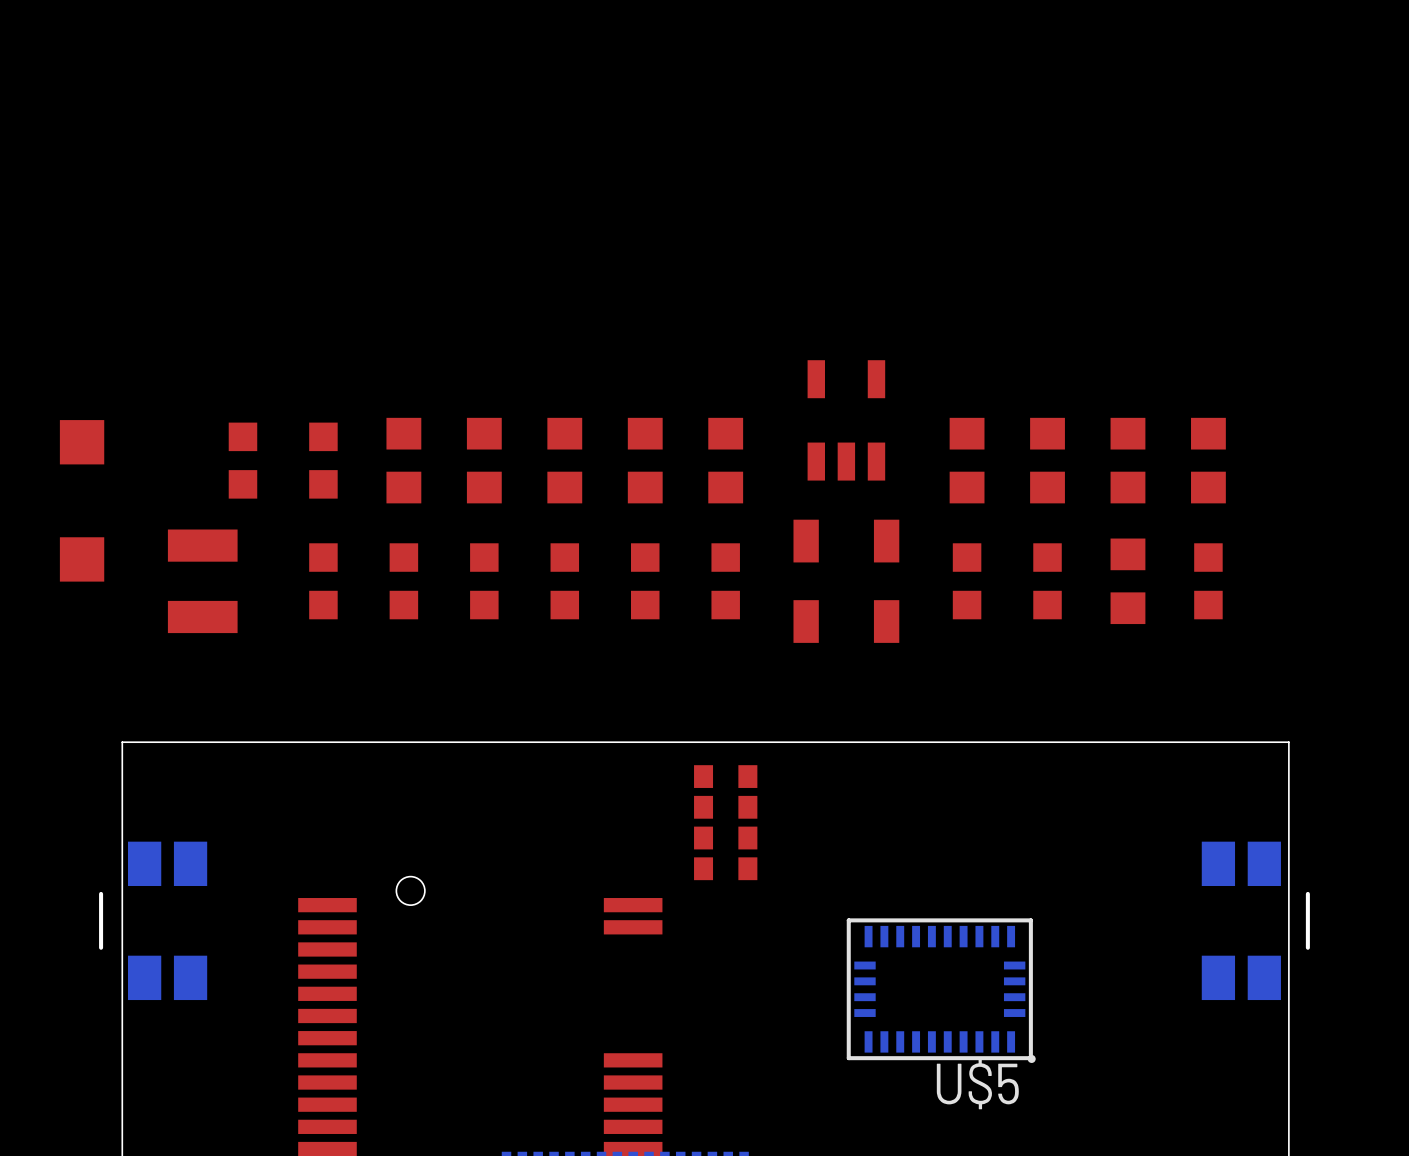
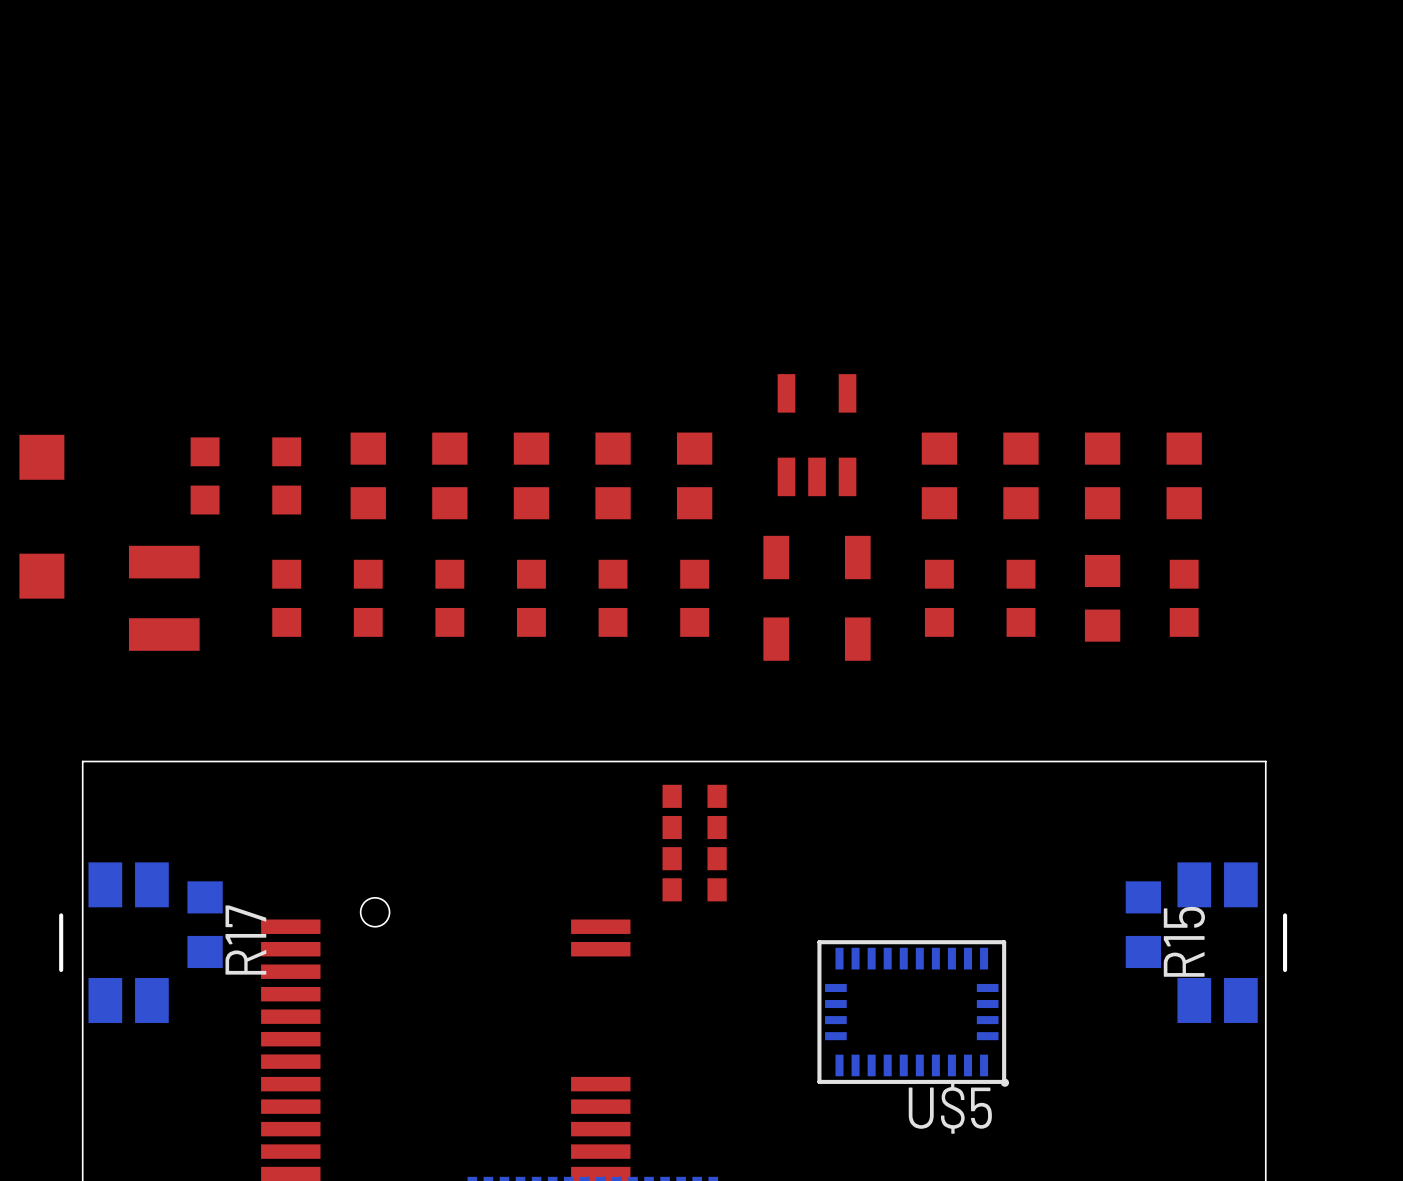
R17: none -> (205, 924)
R15: none -> (1143, 924)

